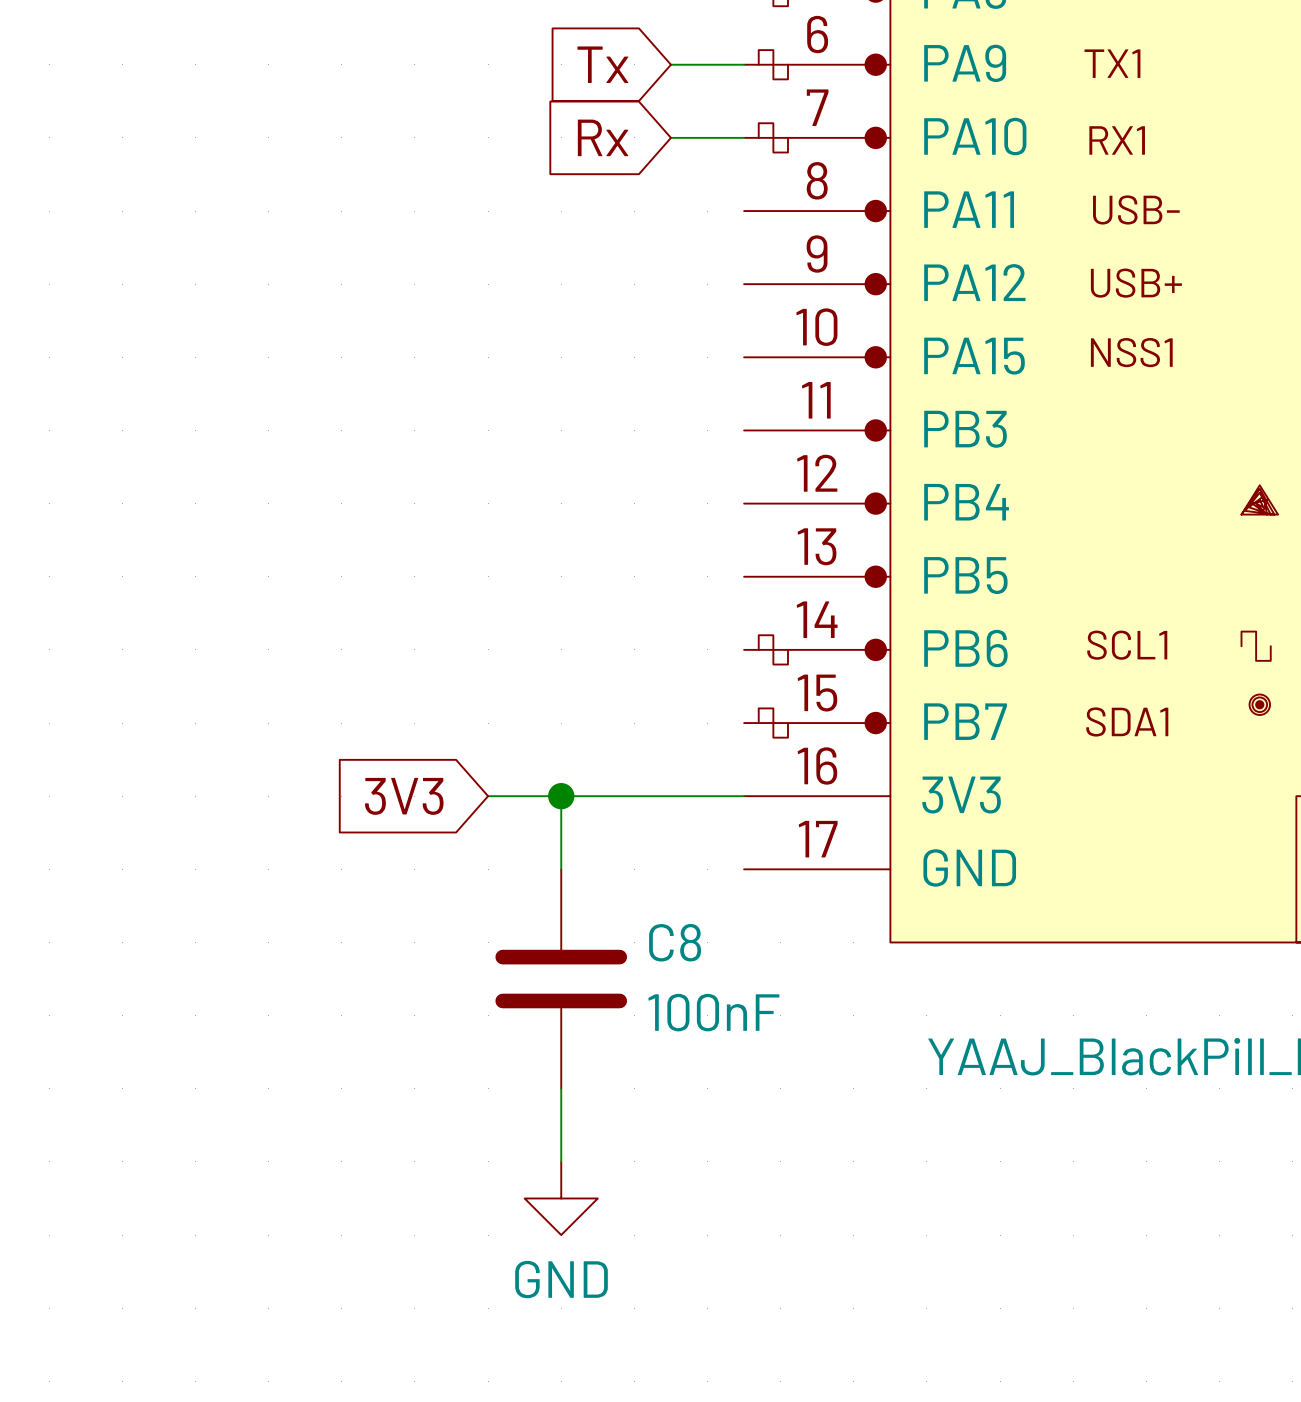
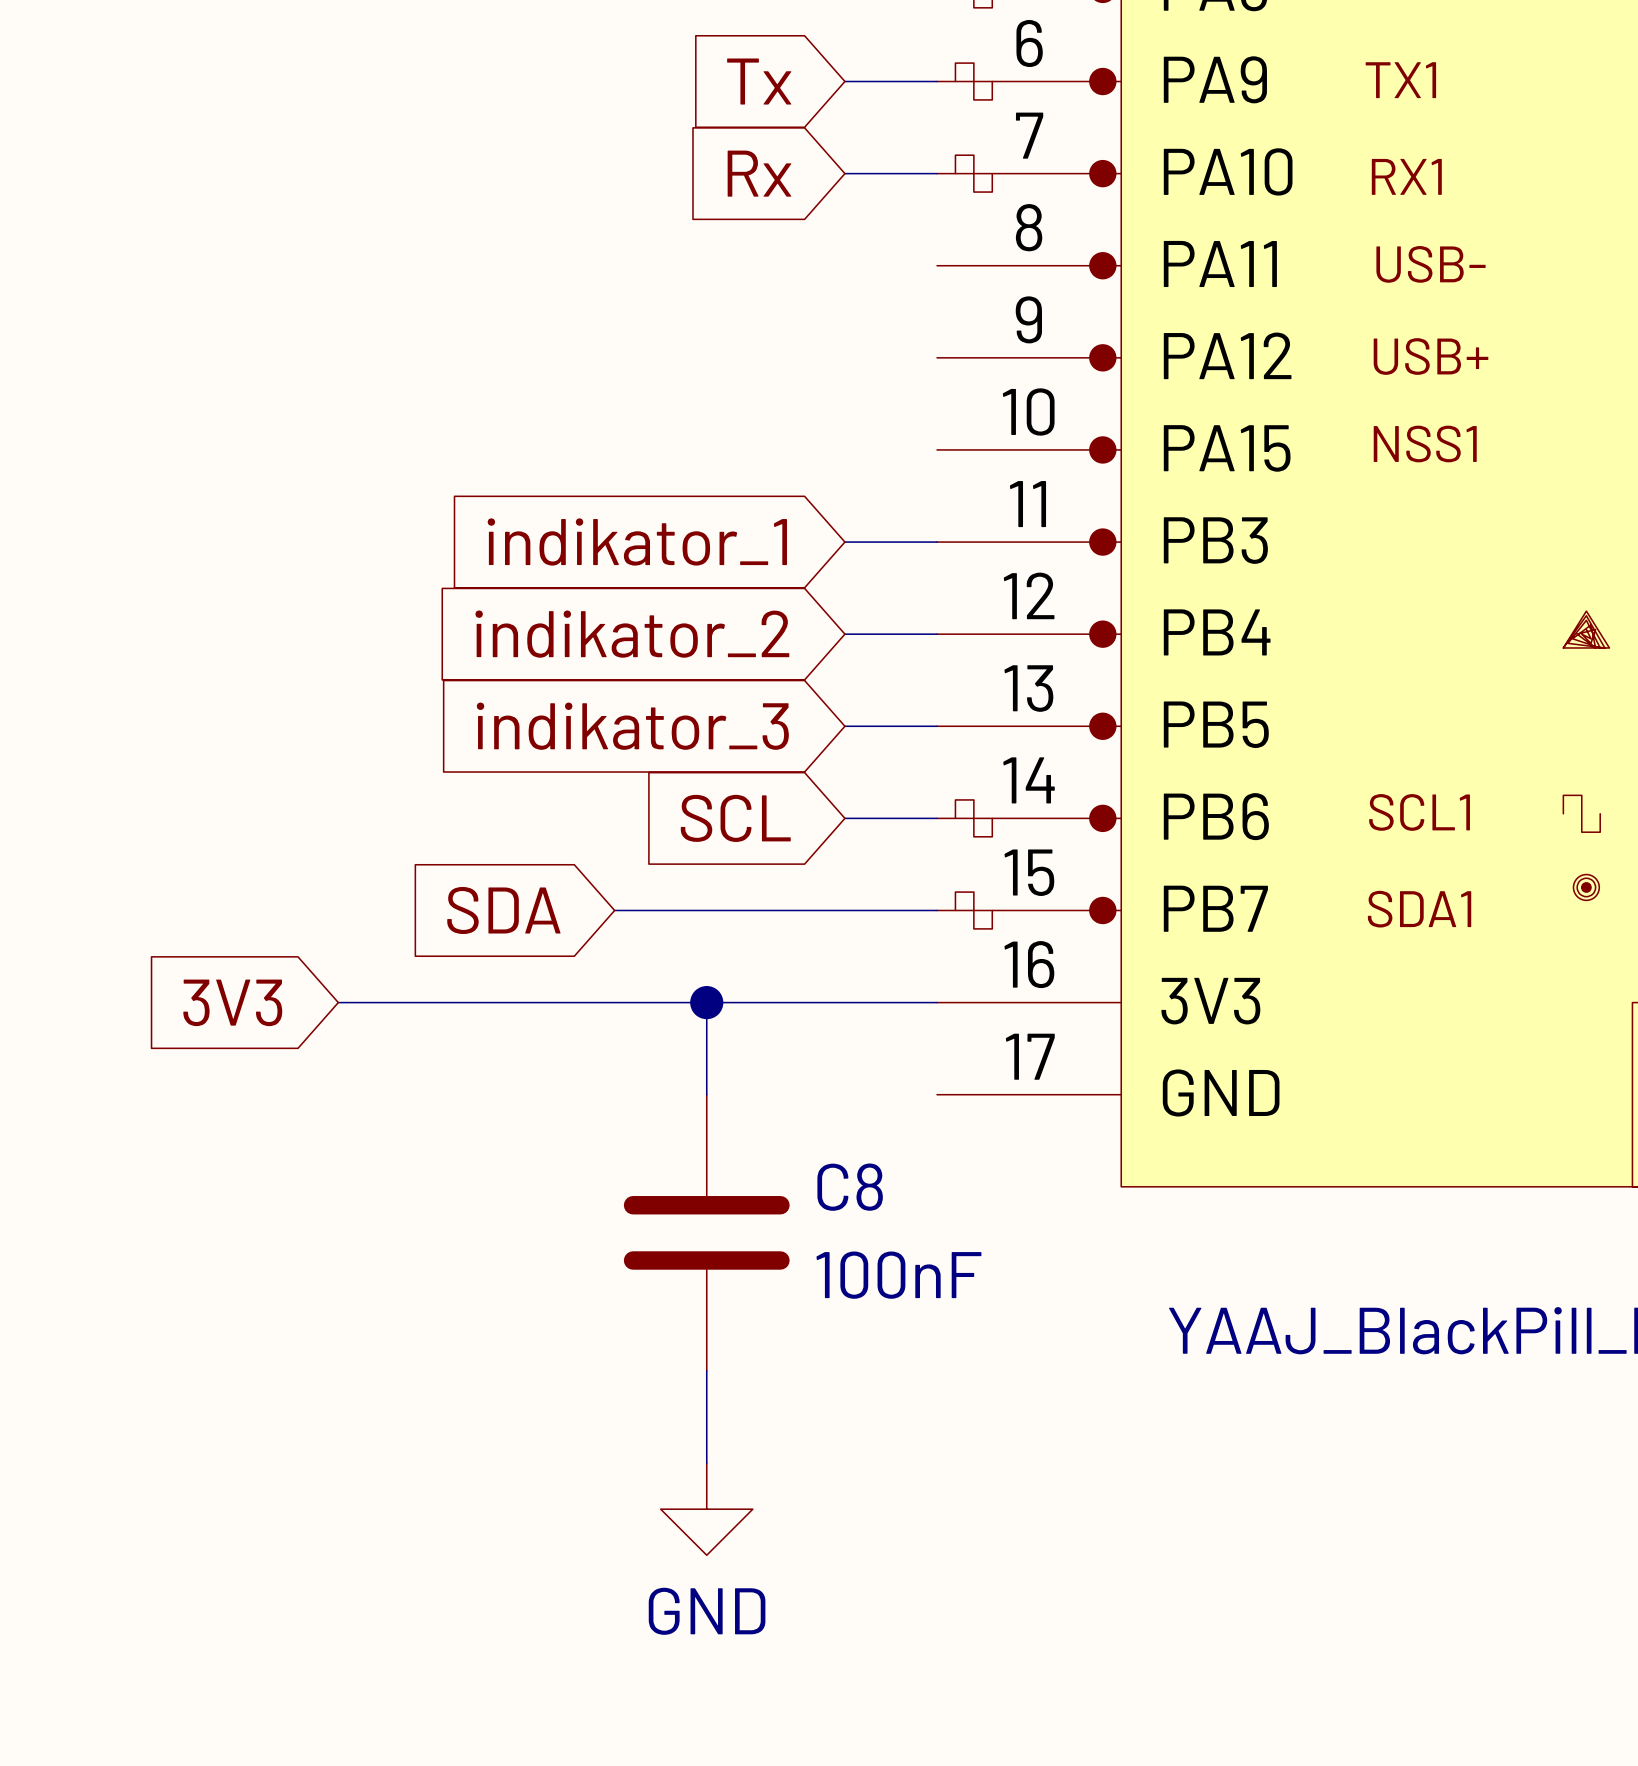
global label: none -> indikator_1 (637, 541)
wire: none -> (844, 542) (937, 542)
global label: none -> indikator_2 (632, 634)
wire: none -> (844, 634) (937, 634)
global label: none -> indikator_3 (632, 726)
wire: none -> (844, 726) (937, 726)
global label: none -> SCL (735, 818)
wire: none -> (844, 818) (937, 818)
global label: none -> SDA (503, 910)
wire: none -> (614, 910) (937, 910)
wire: none -> (338, 1002) (614, 1002)
global label position: 3V3 (404, 796) -> 3V3 (232, 1002)

